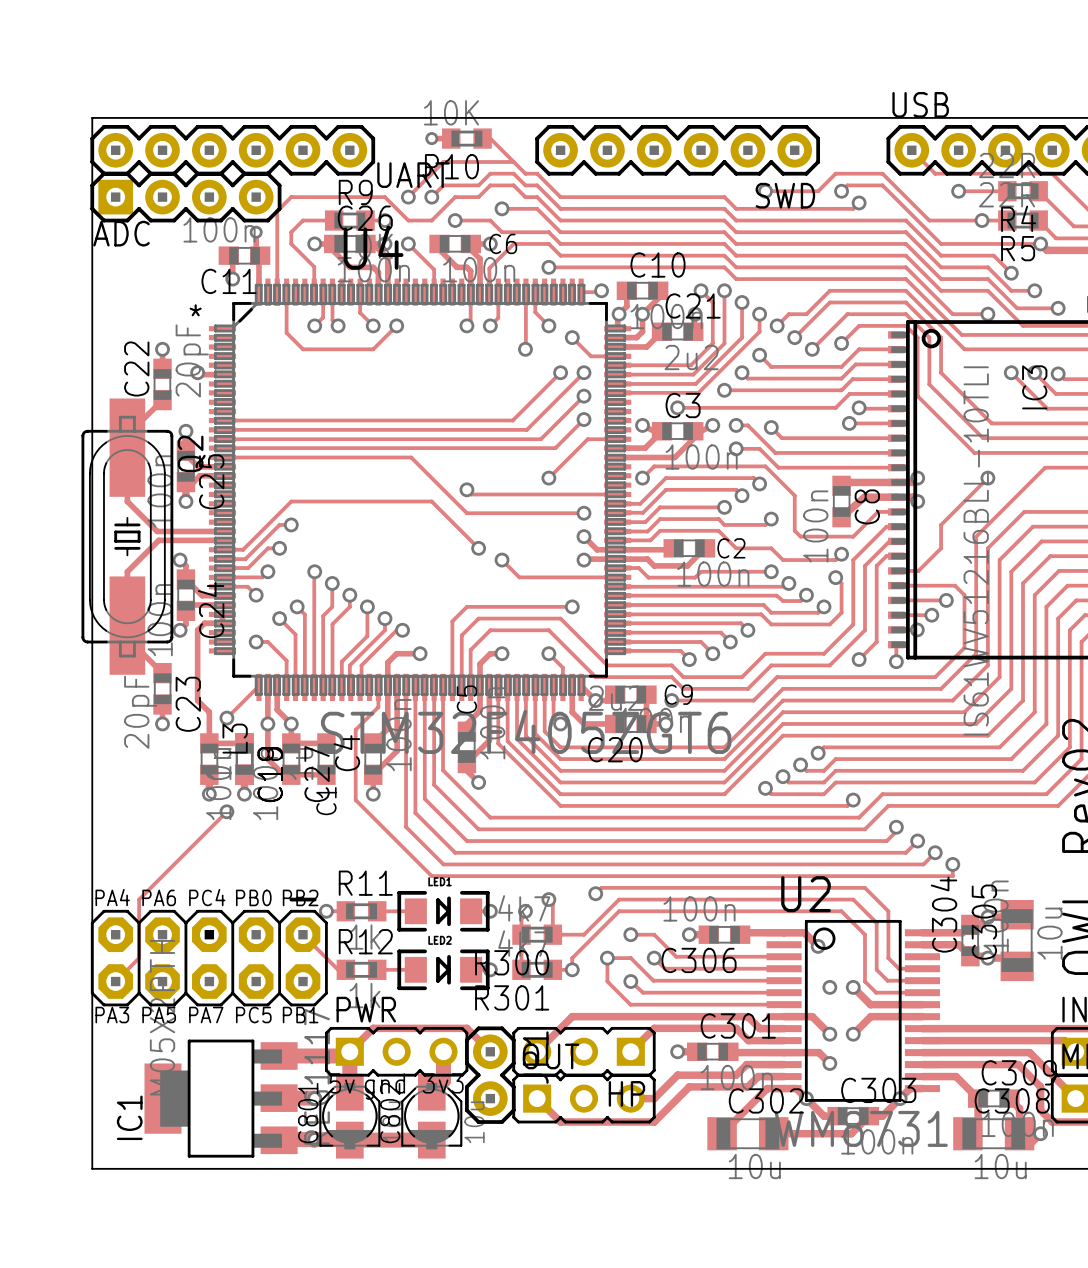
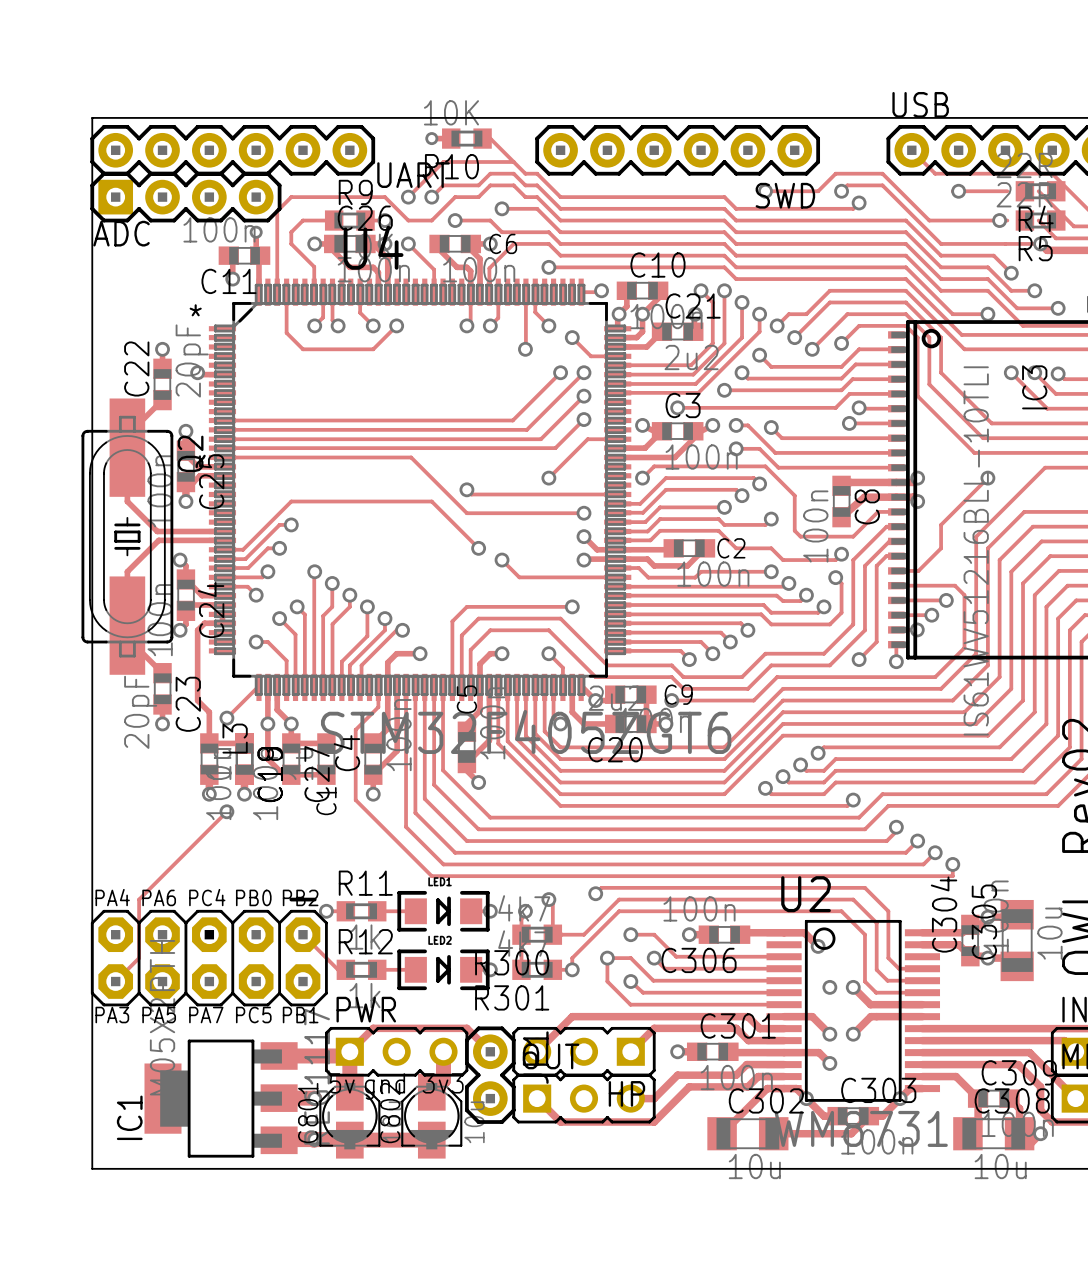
R4 position: (1023, 191) -> (1040, 191)
via position: (982, 220) -> (999, 220)
R5 position: (1023, 220) -> (1040, 220)

